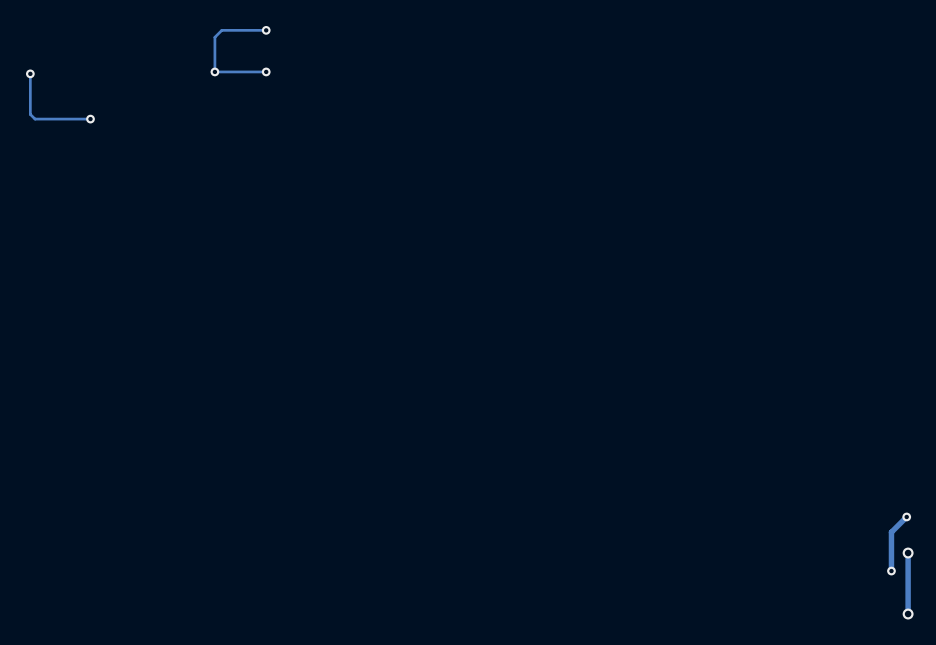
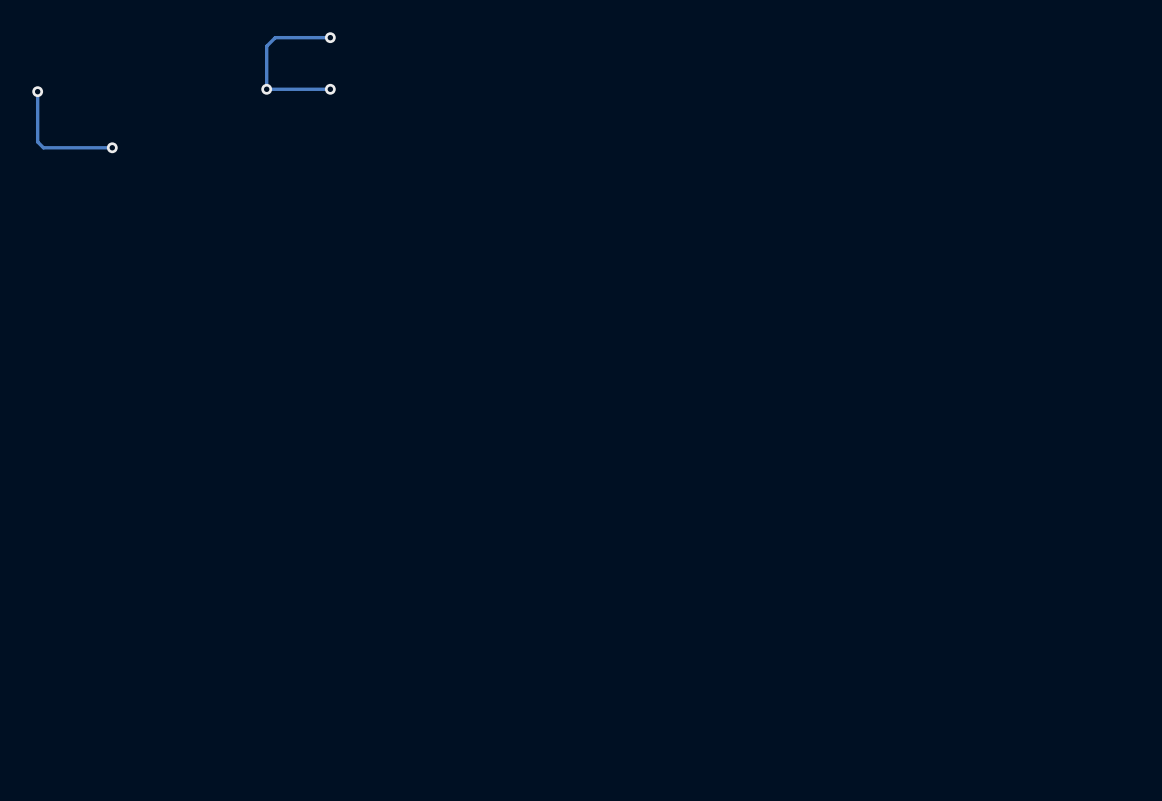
track: (906, 516) (891, 532) (891, 571) -> none
via: (906, 516) -> none
track: (908, 553) (908, 614) -> none
via: (908, 553) -> none
via: (891, 571) -> none
via: (908, 614) -> none

